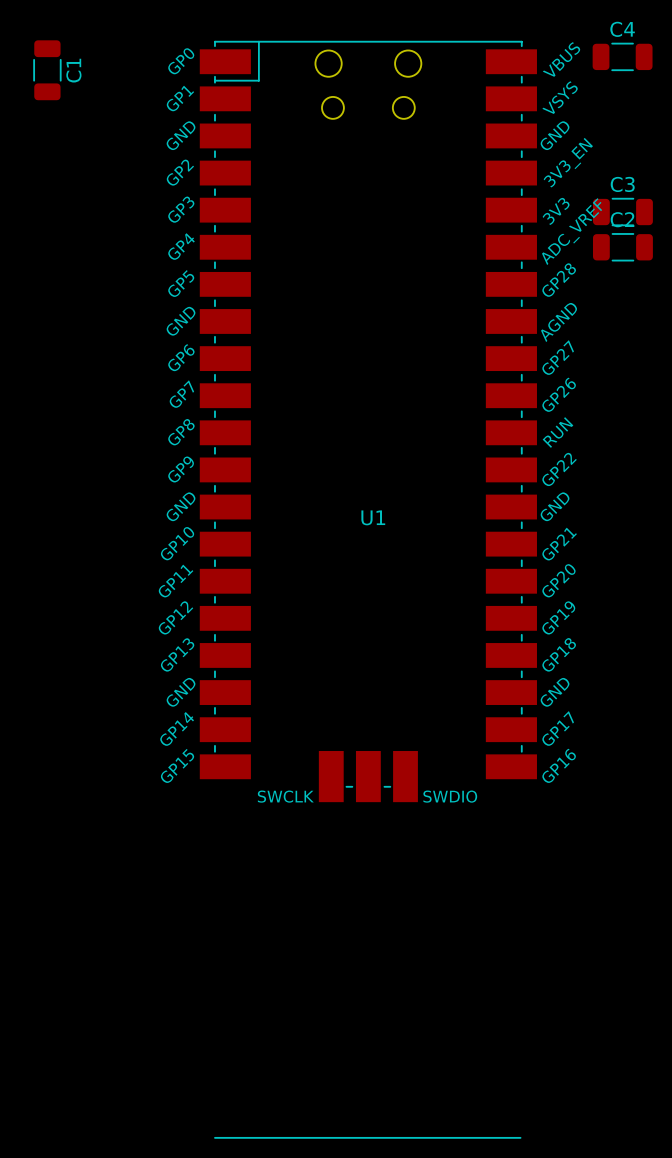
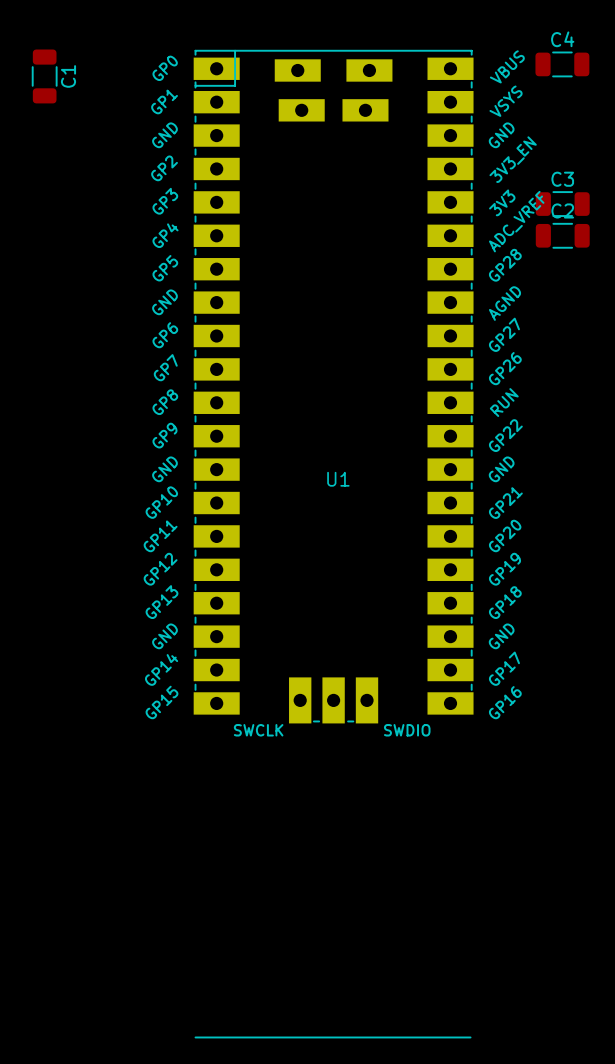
U1 footprint: [199, 40, 537, 1139] -> [193, 49, 474, 1039]

